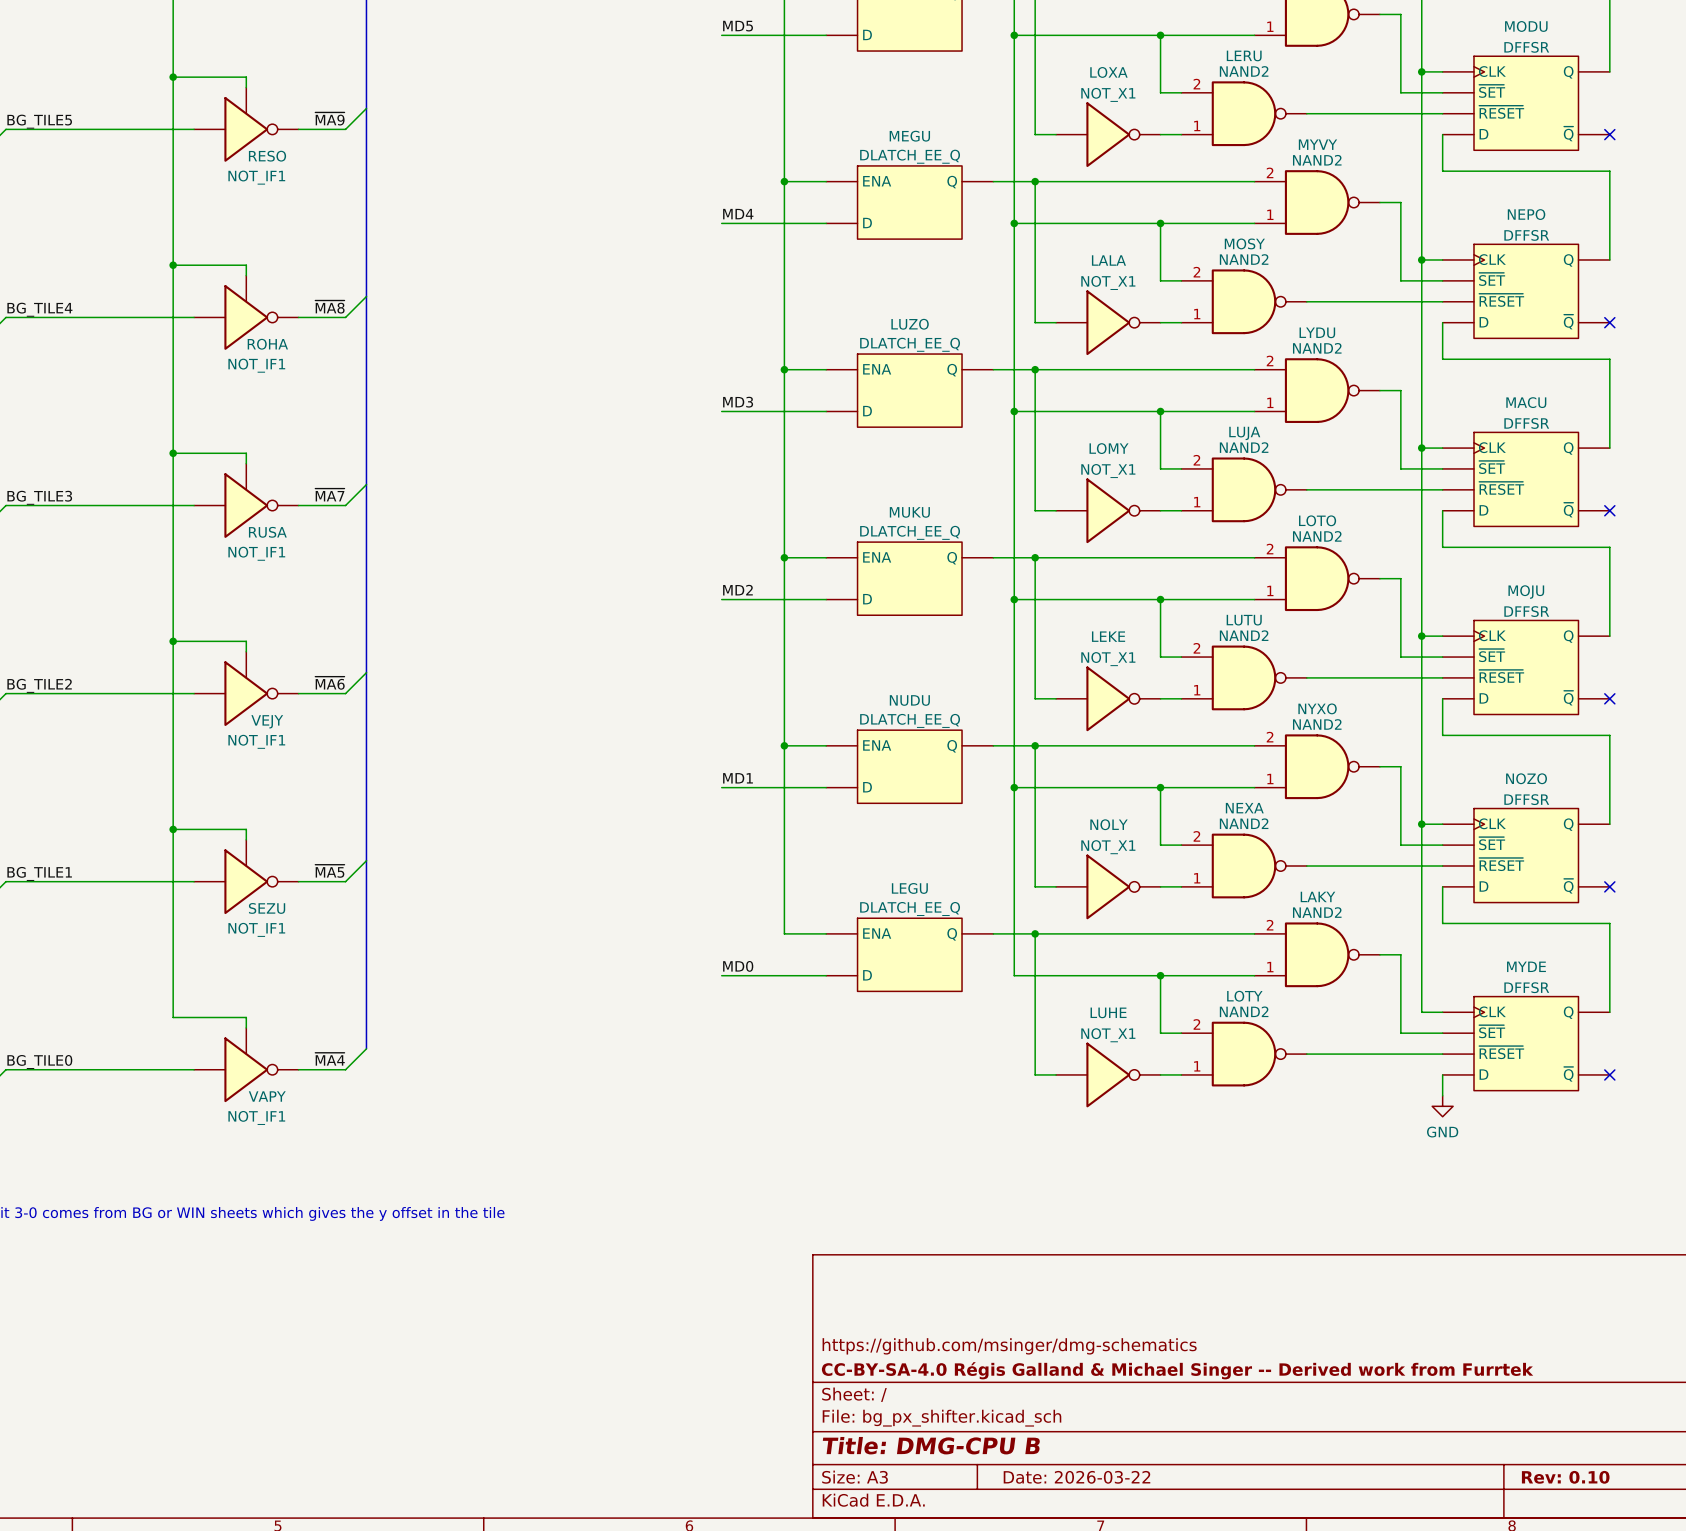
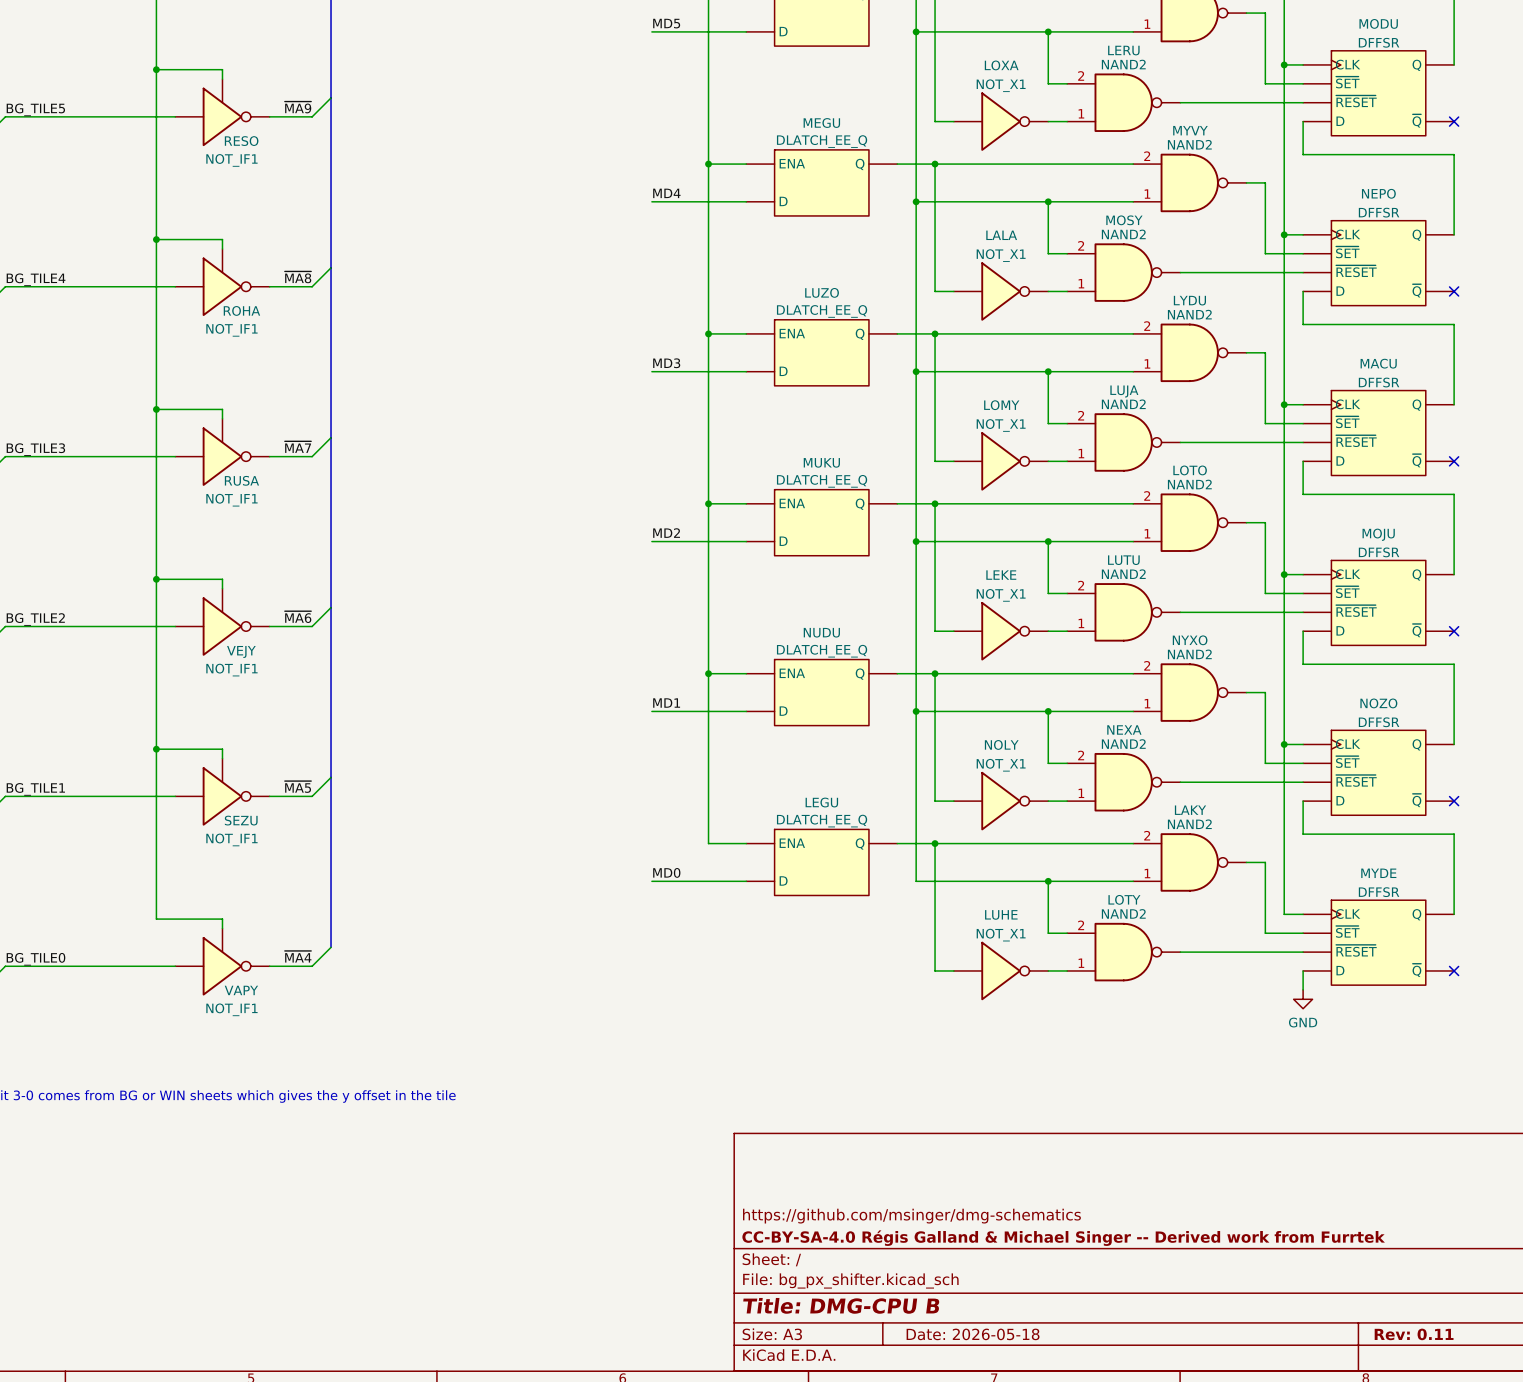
title block: Date: 2026-03-22 (1076, 1477) -> Date: 2026-05-18 (973, 1334)
title block: Rev: 0.10 (1565, 1477) -> Rev: 0.11 (1414, 1334)

